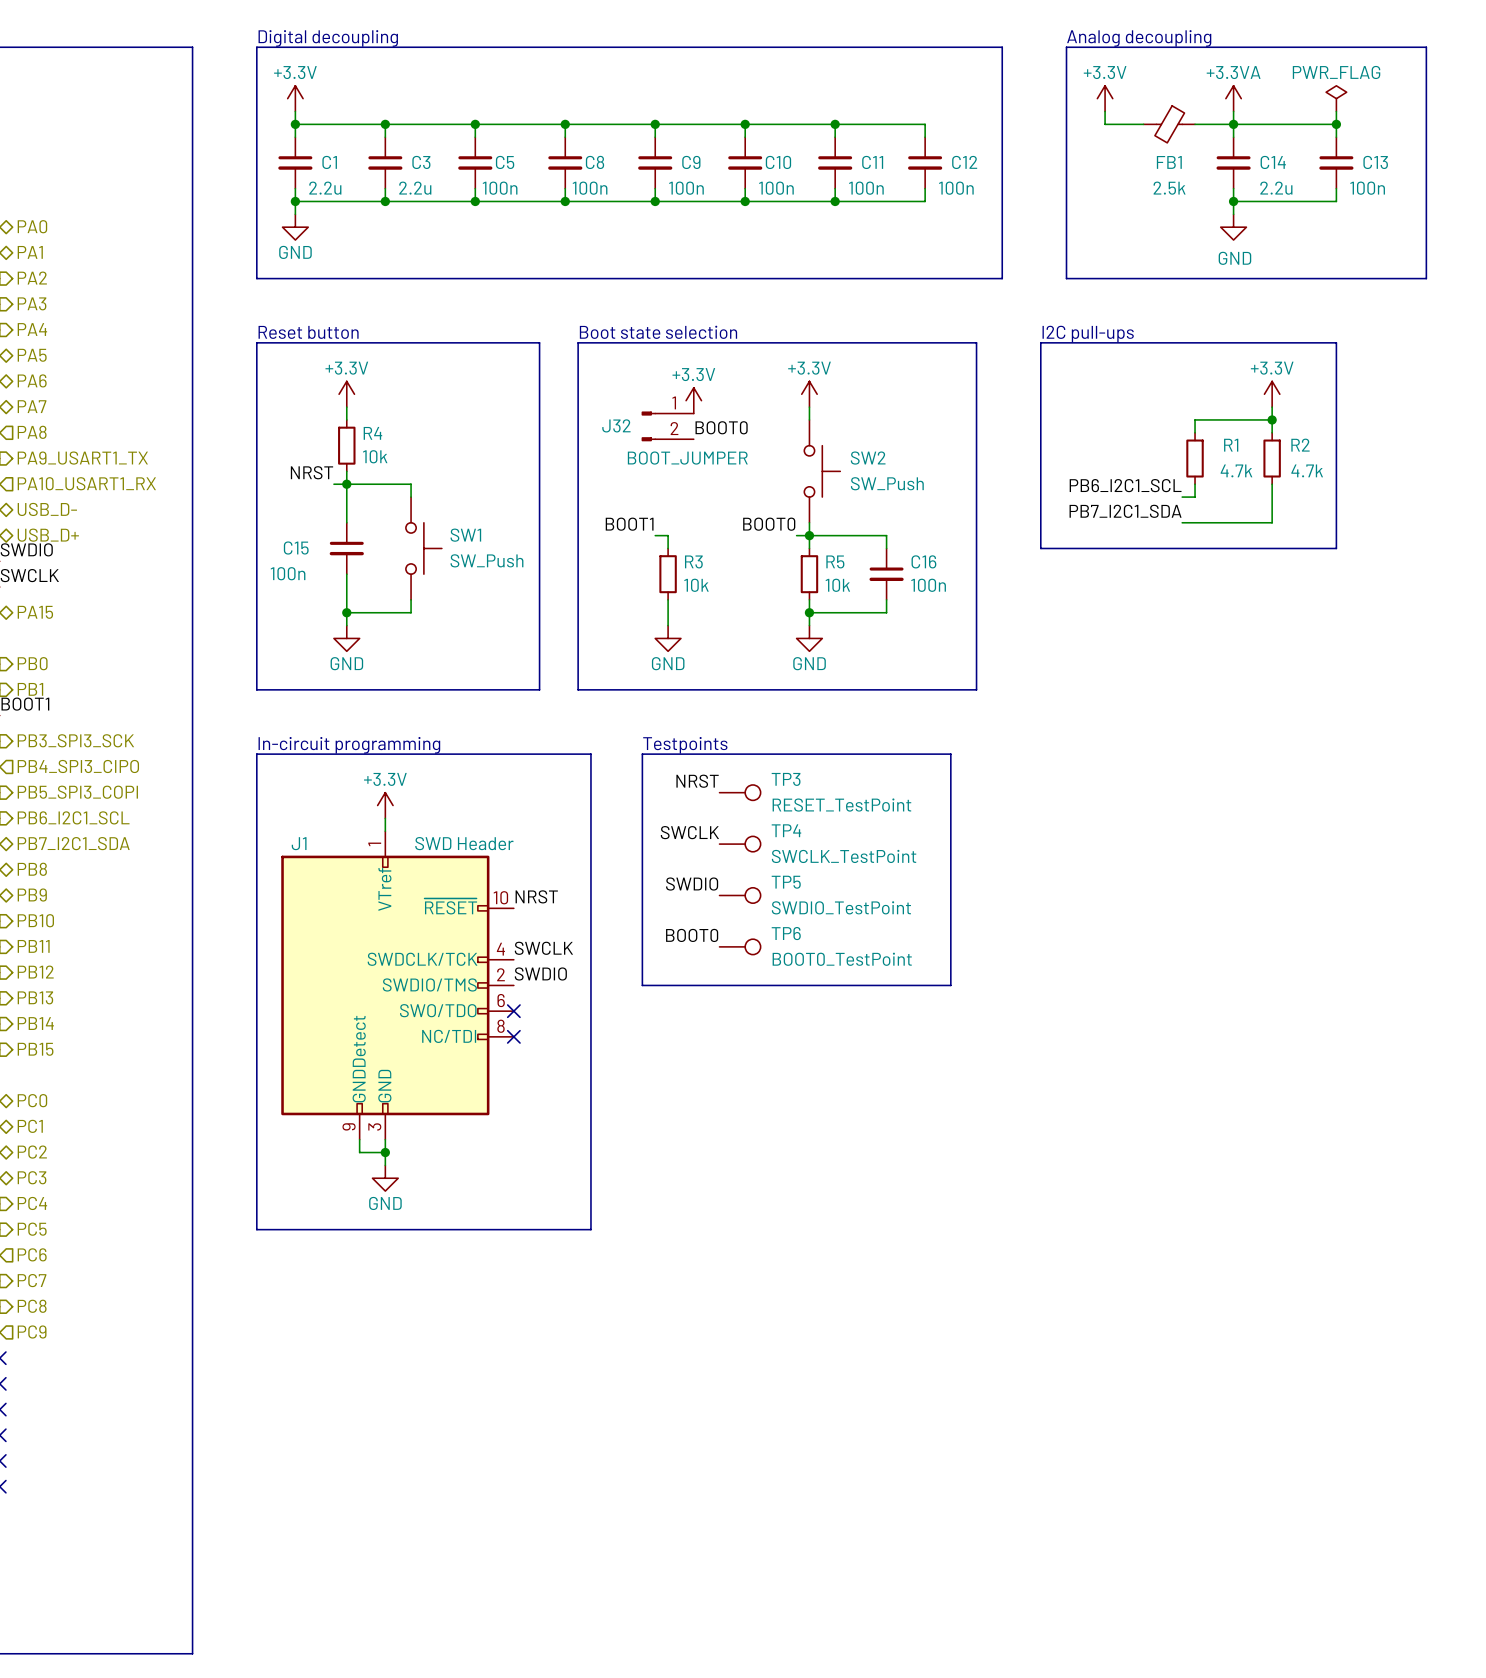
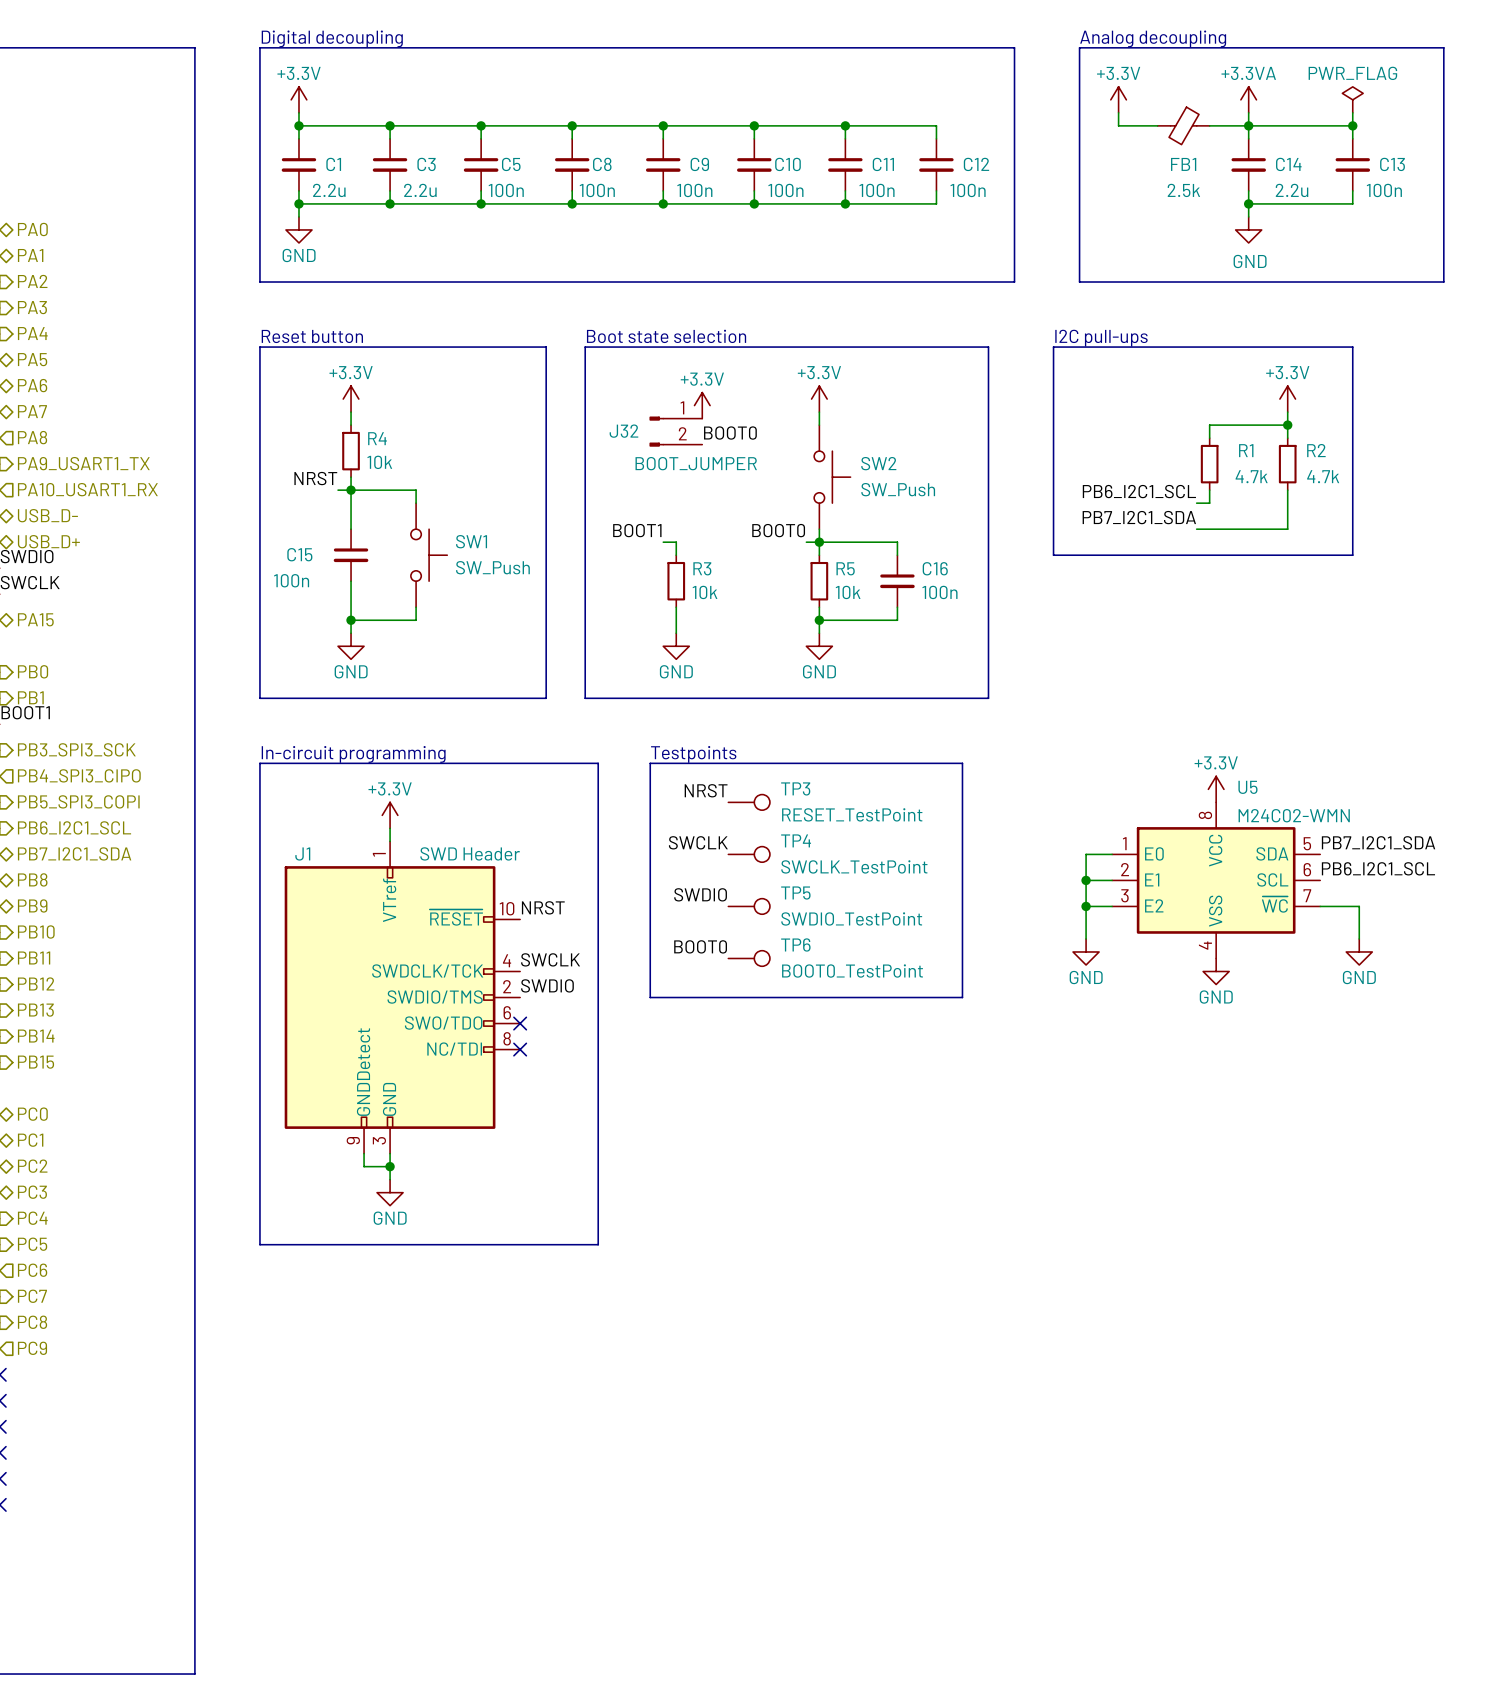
power symbol: none -> +3.3V (1216, 789)
label: none -> PB7_I2C1_SDA (1378, 842)
wire: none -> (1112, 854) (1086, 854) (1086, 938)
label: none -> PB6_I2C1_SCL (1378, 868)
wire: none -> (1086, 880) (1112, 880)
junction: none -> (1086, 880)
U5: none -> M24C02-WMN (1216, 880)
wire: none -> (1086, 906) (1112, 906)
junction: none -> (1086, 906)
wire: none -> (1320, 906) (1359, 906) (1359, 938)
power symbol: none -> GND (1086, 951)
power symbol: none -> GND (1359, 951)
power symbol: none -> GND (1216, 971)

